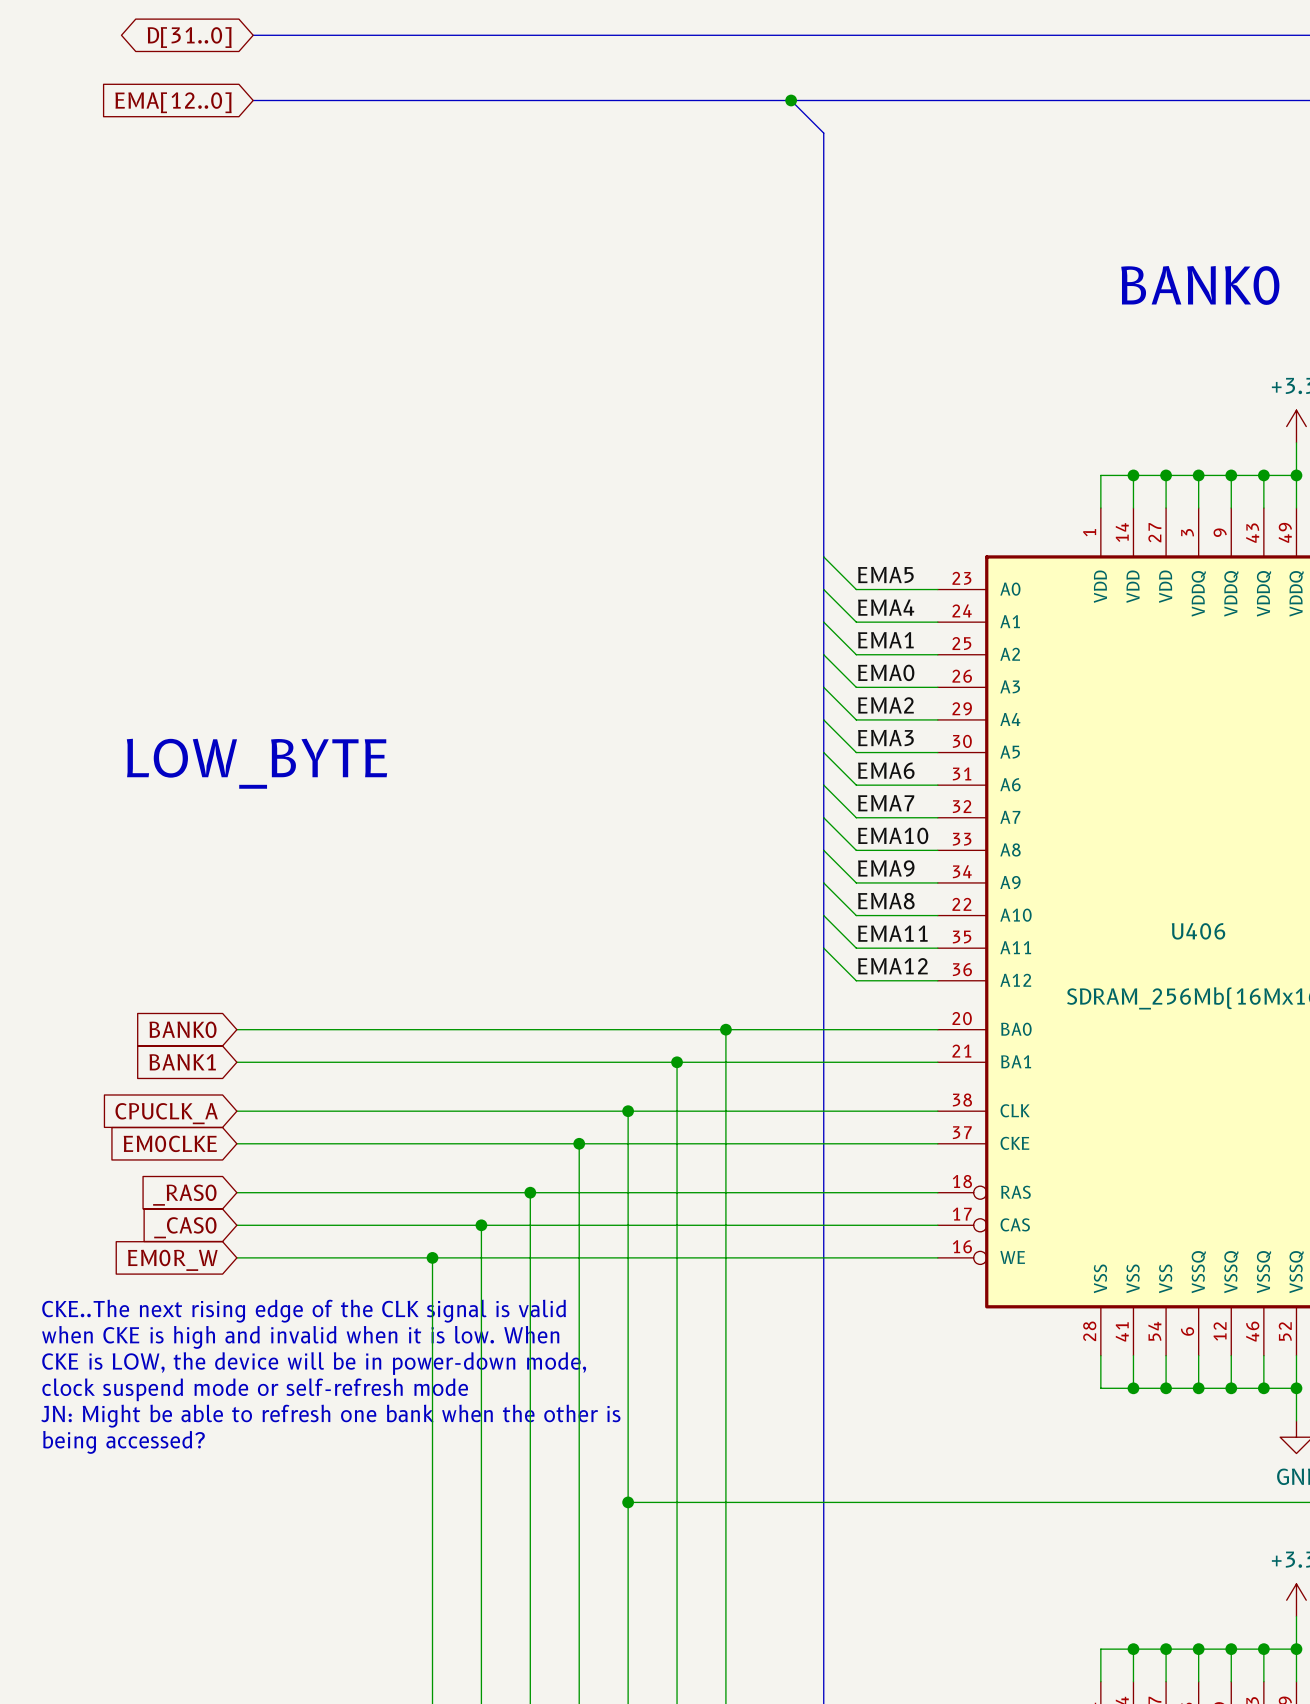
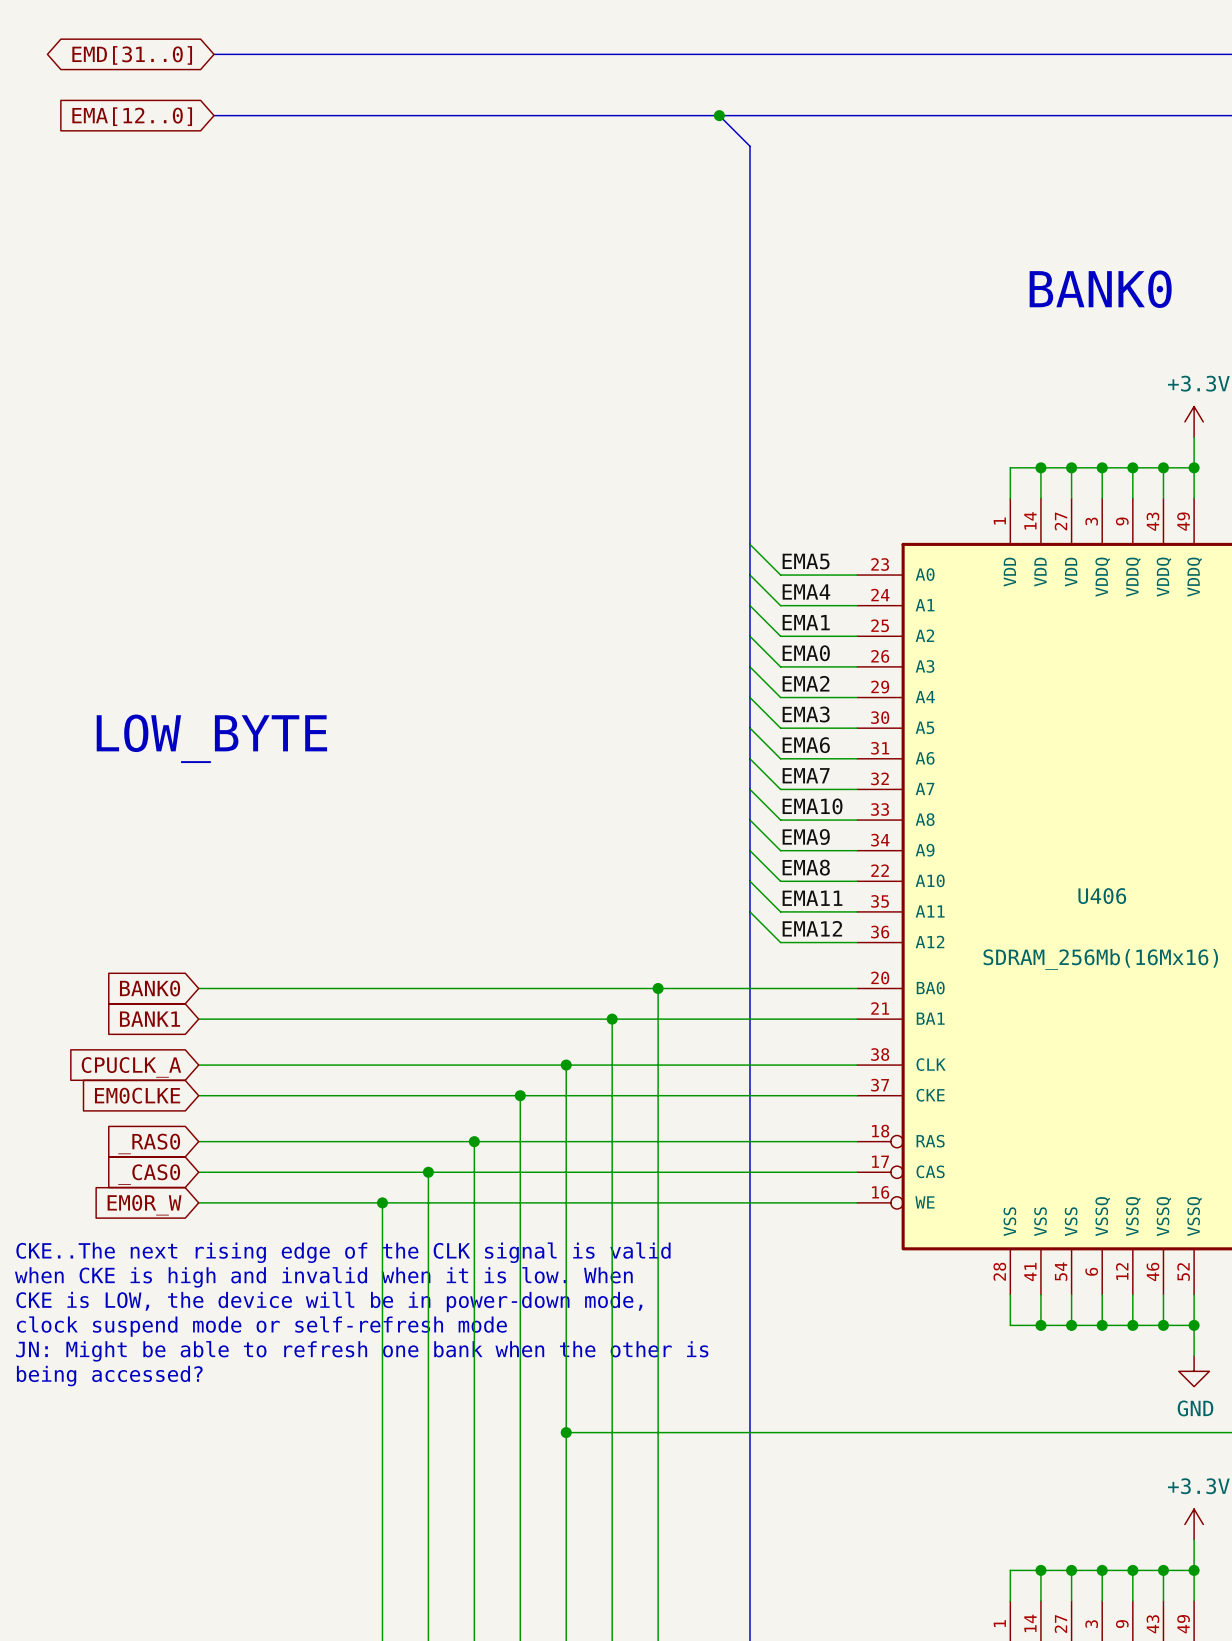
global label: D[31..0] (189, 37) -> EMD[31..0] (132, 55)

